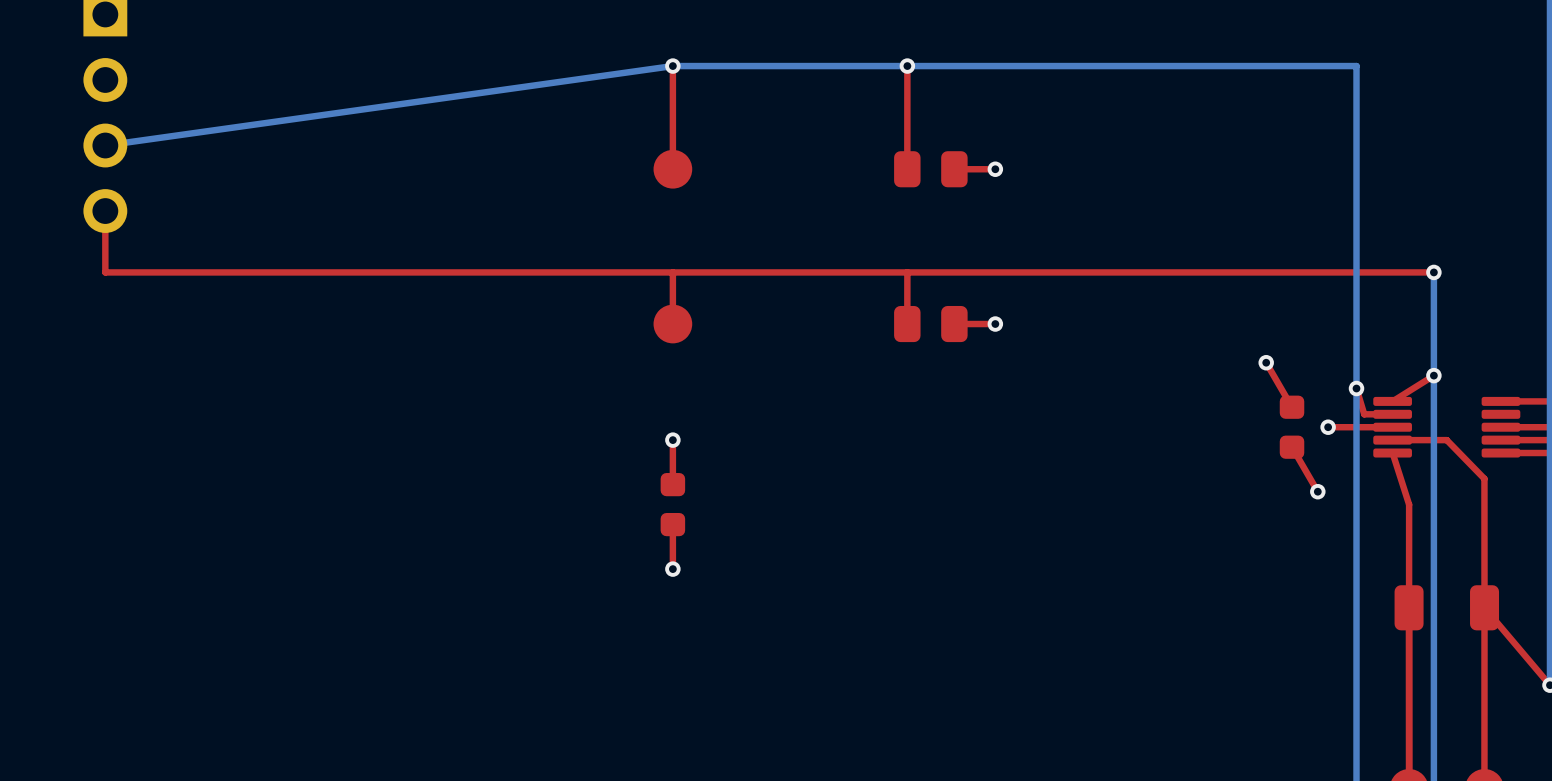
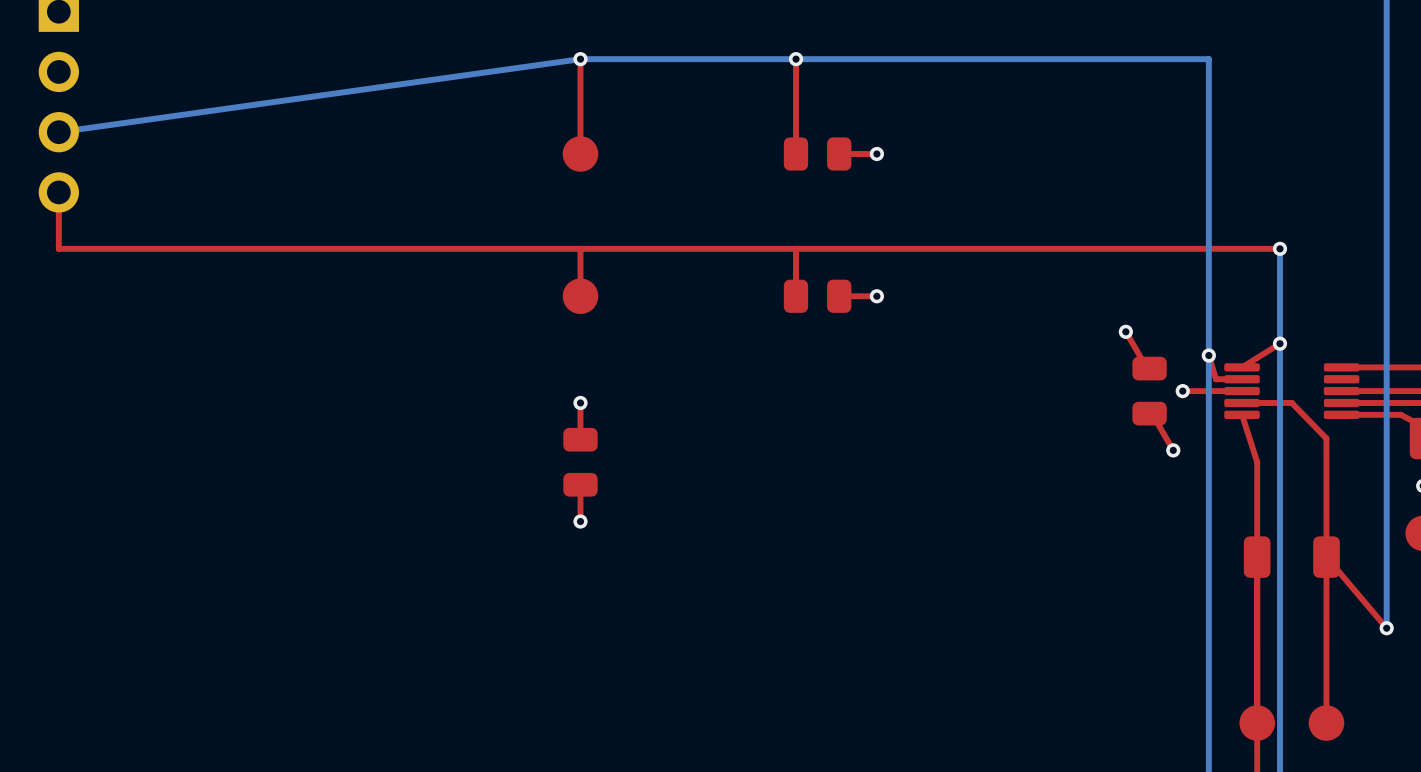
part footprint: [1279, 395, 1305, 459] -> [1132, 356, 1167, 426]
part footprint: [660, 473, 686, 537] -> [563, 427, 598, 497]

